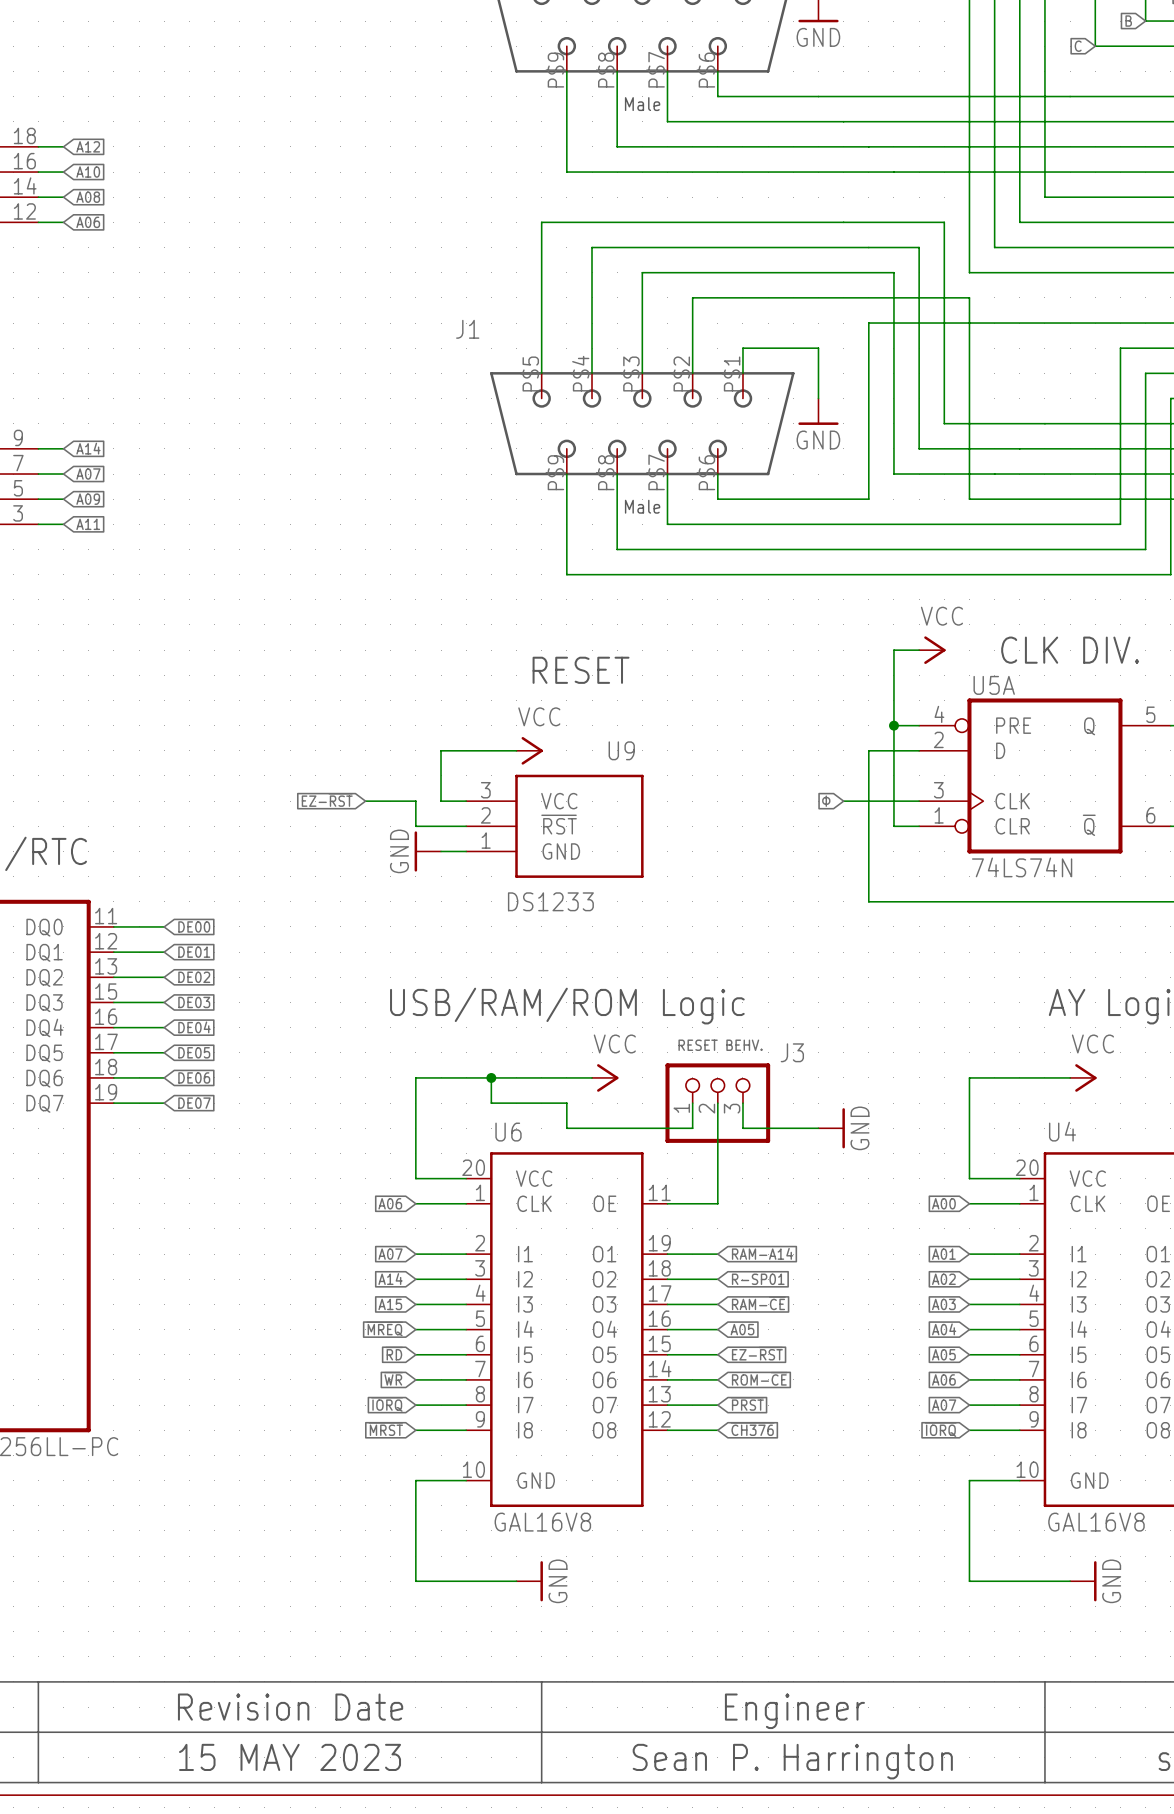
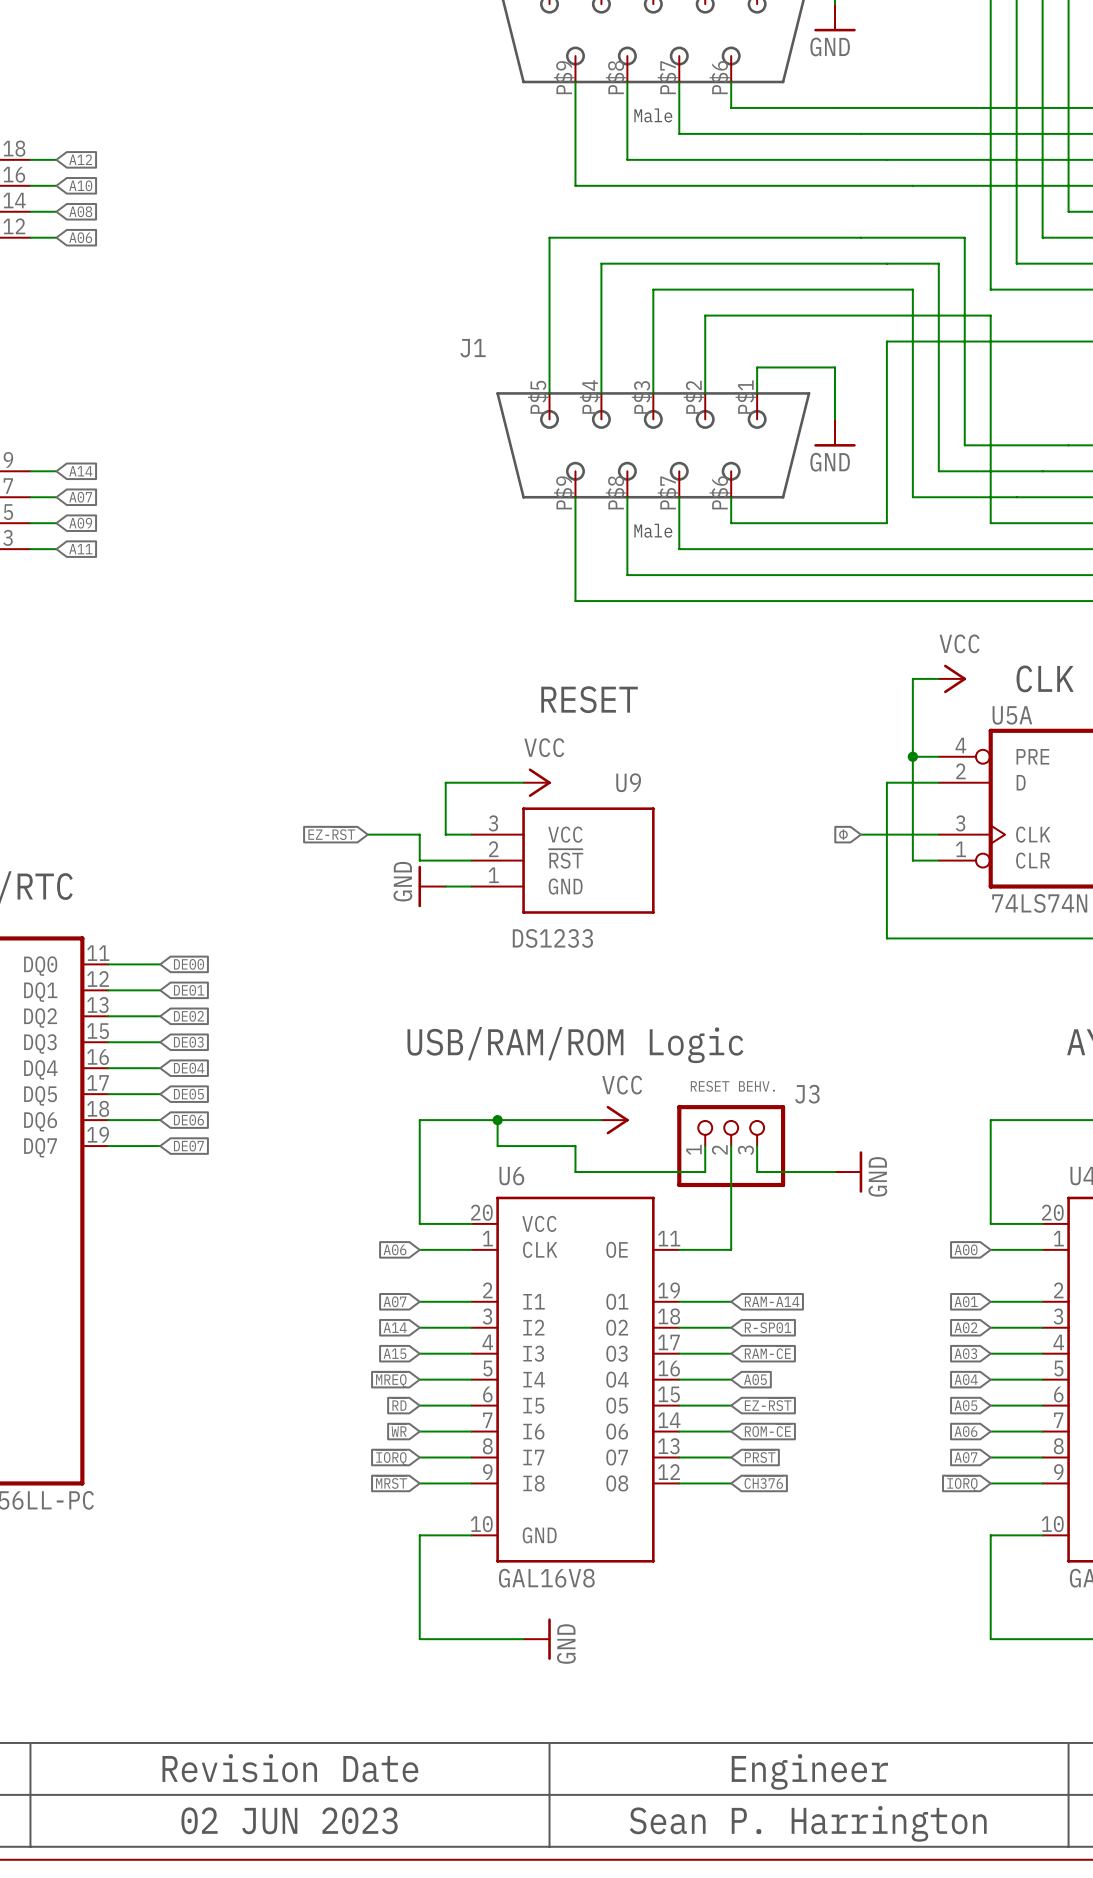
text: 15 MAY 2023 (290, 1757) -> 02 JUN 2023 (289, 1820)

